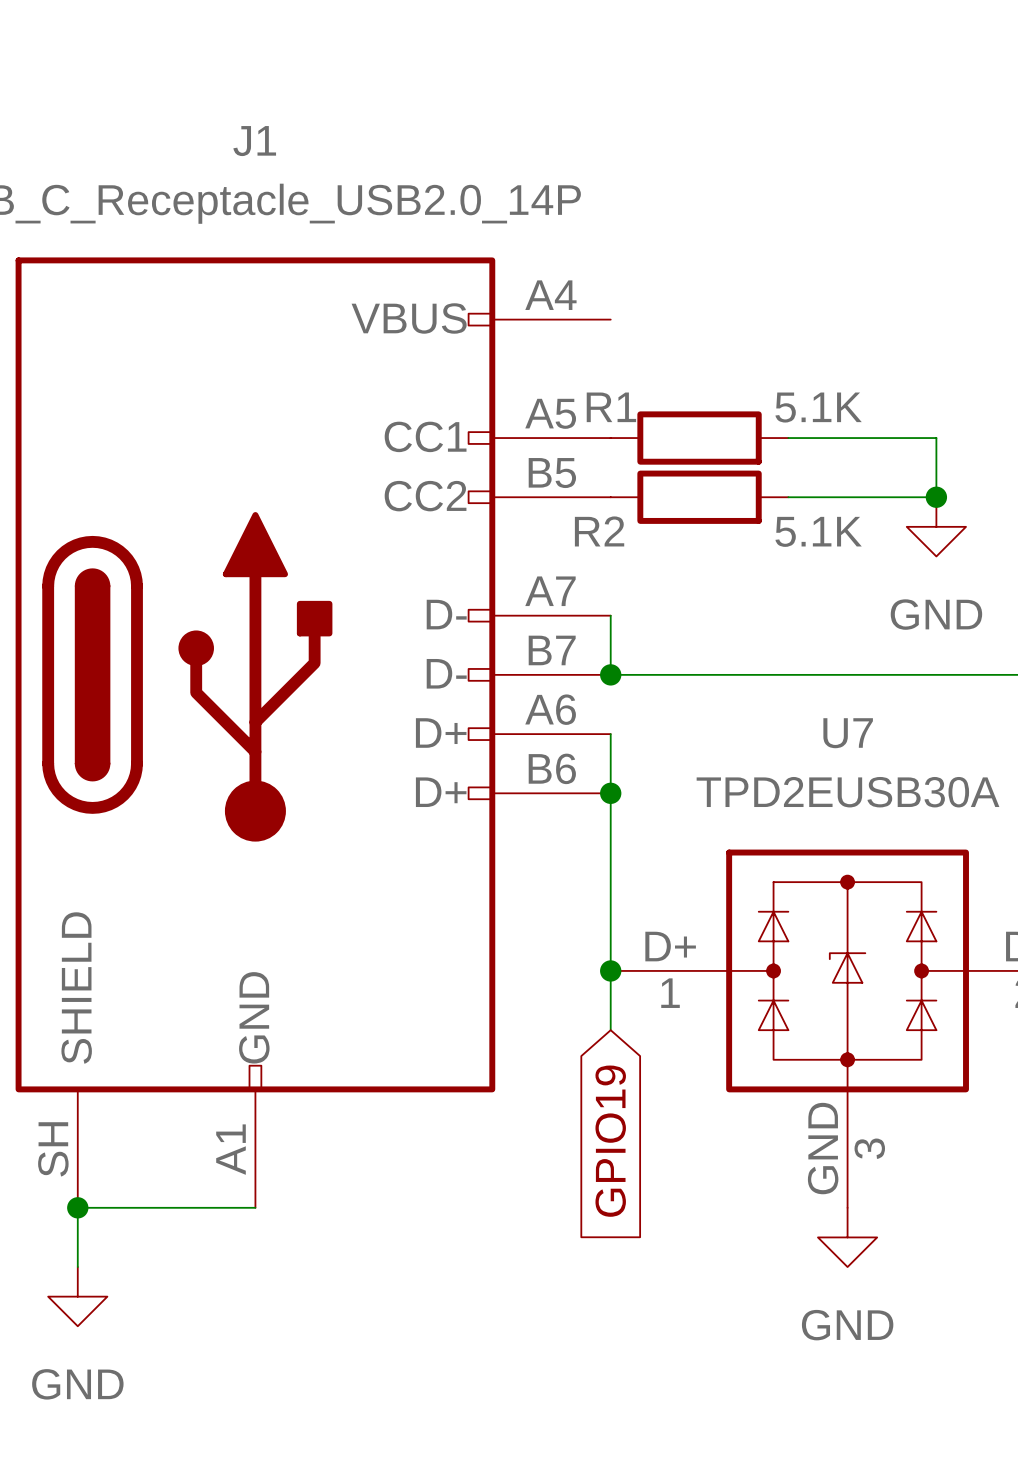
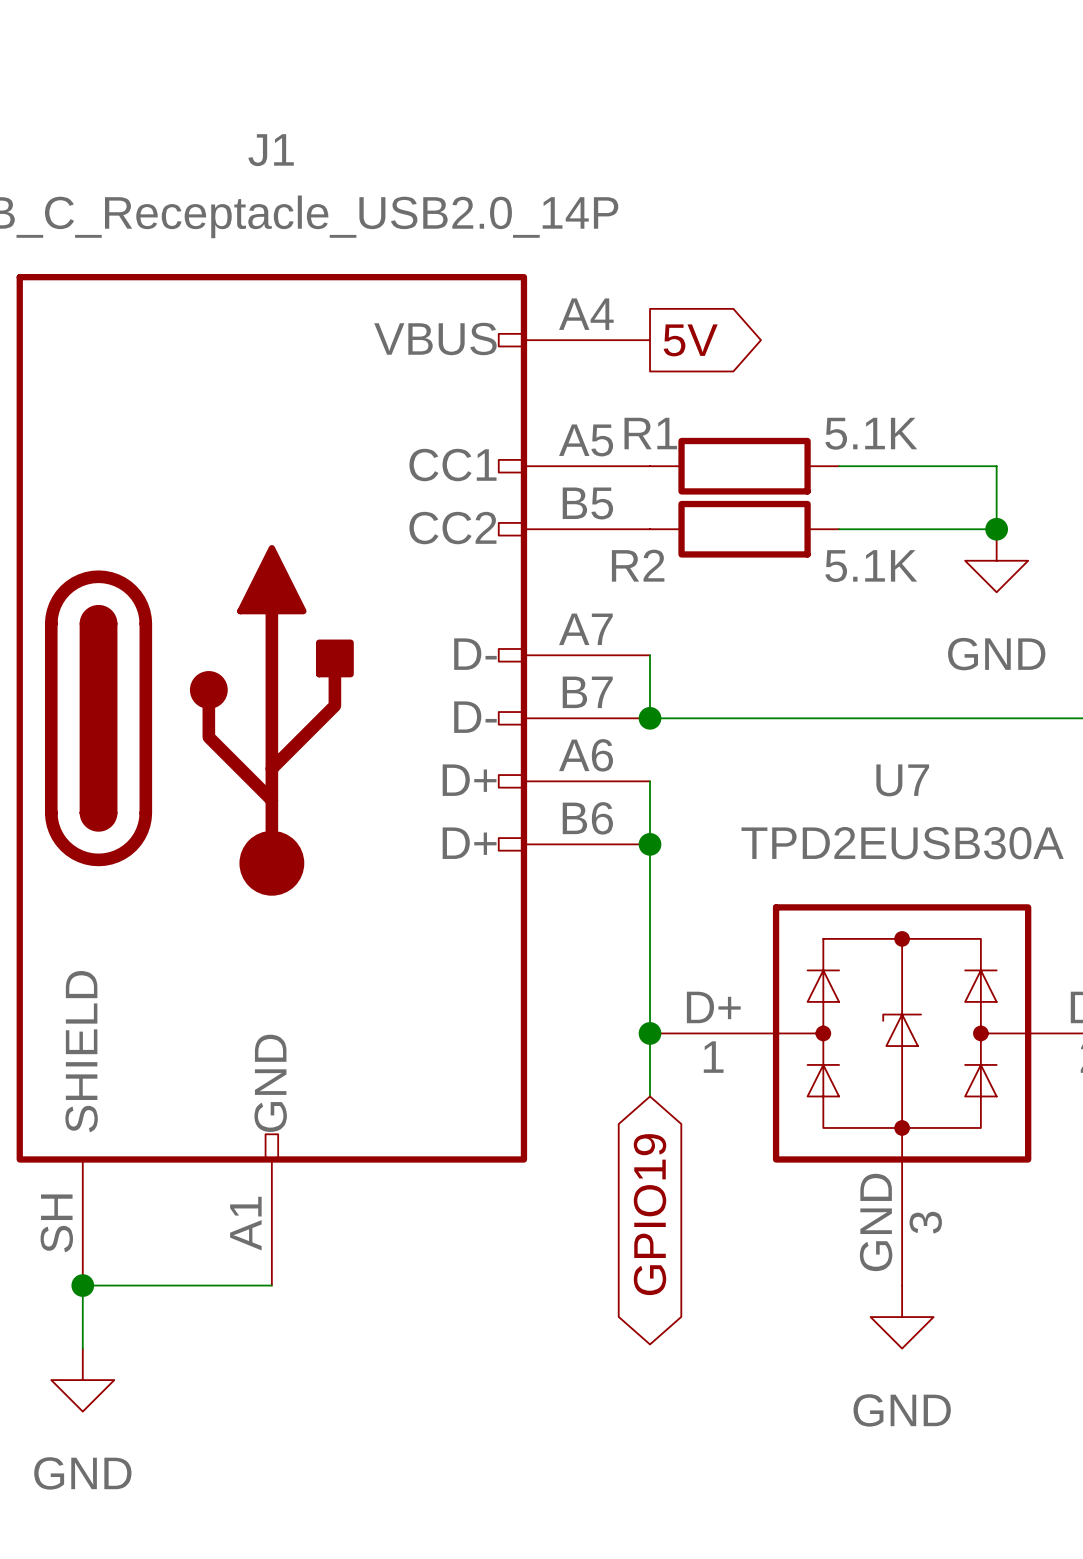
global label: none -> 5V (690, 340)
global label shape: input (610, 1141) -> bidirectional (650, 1214)

